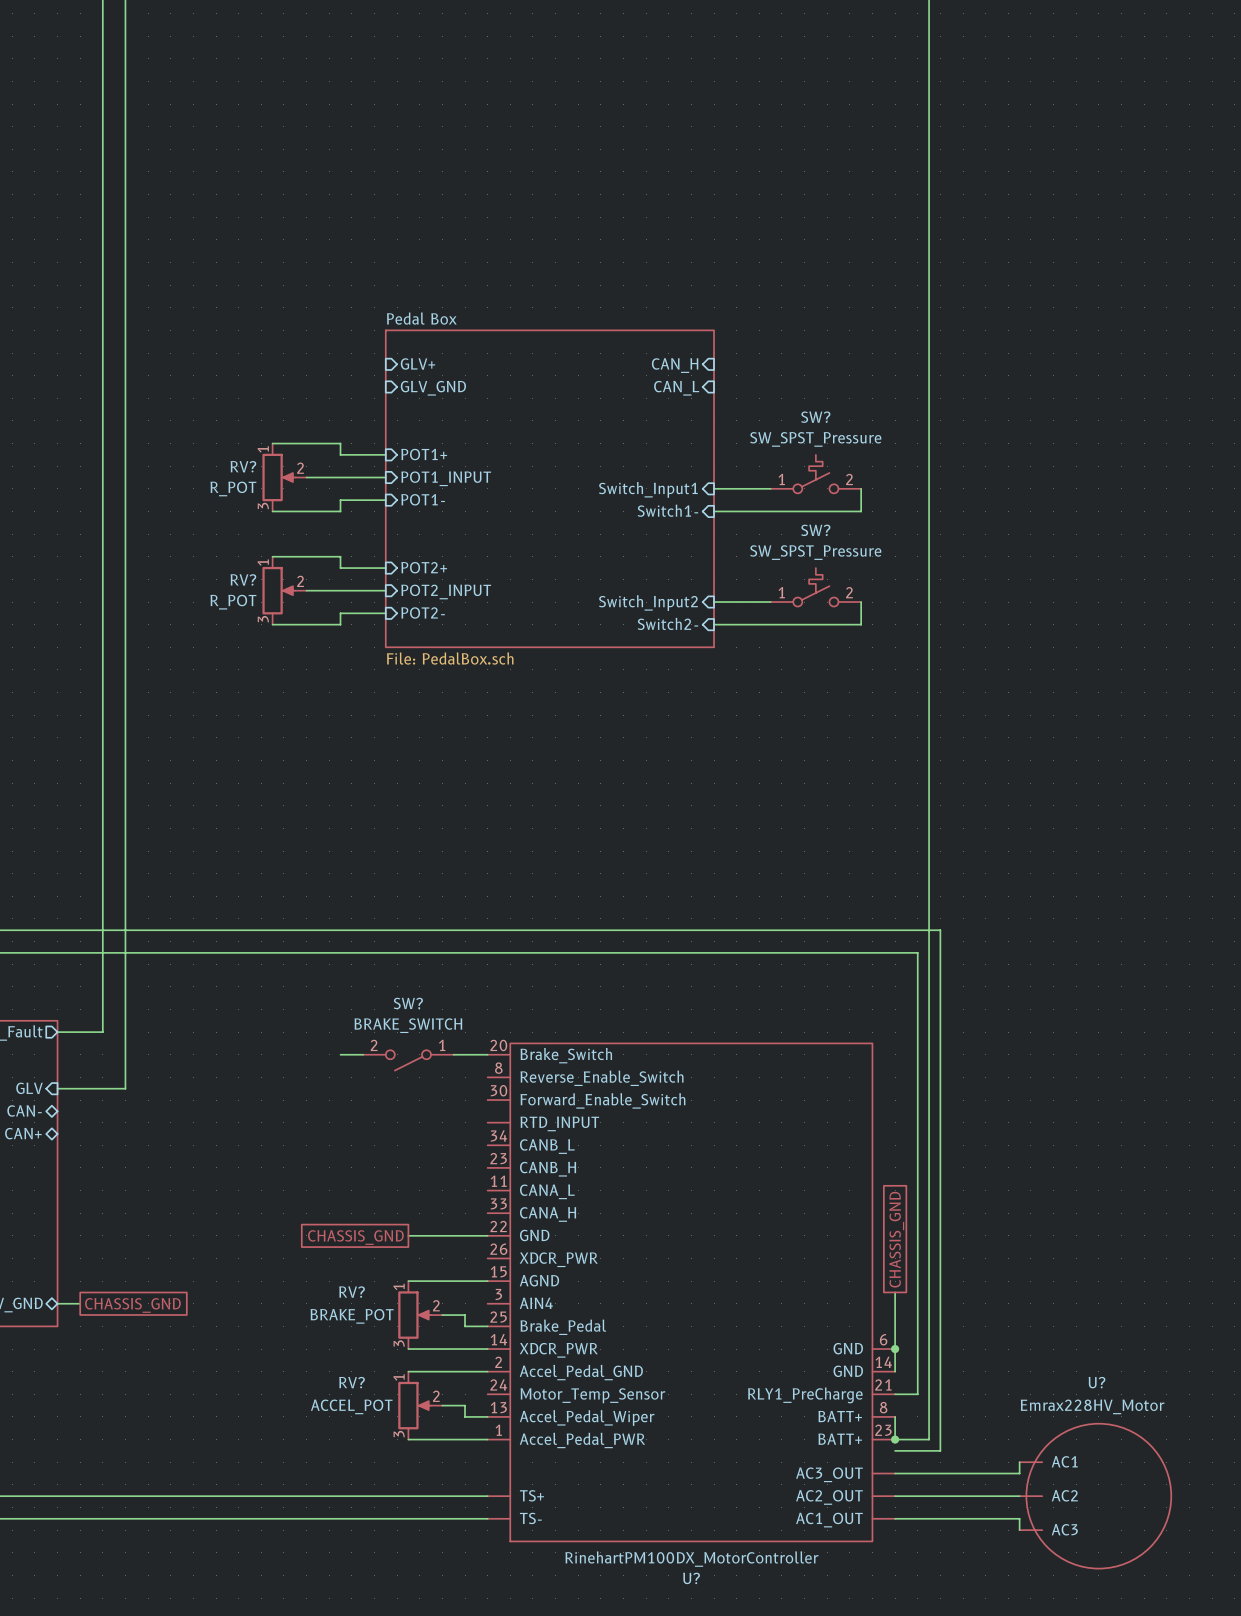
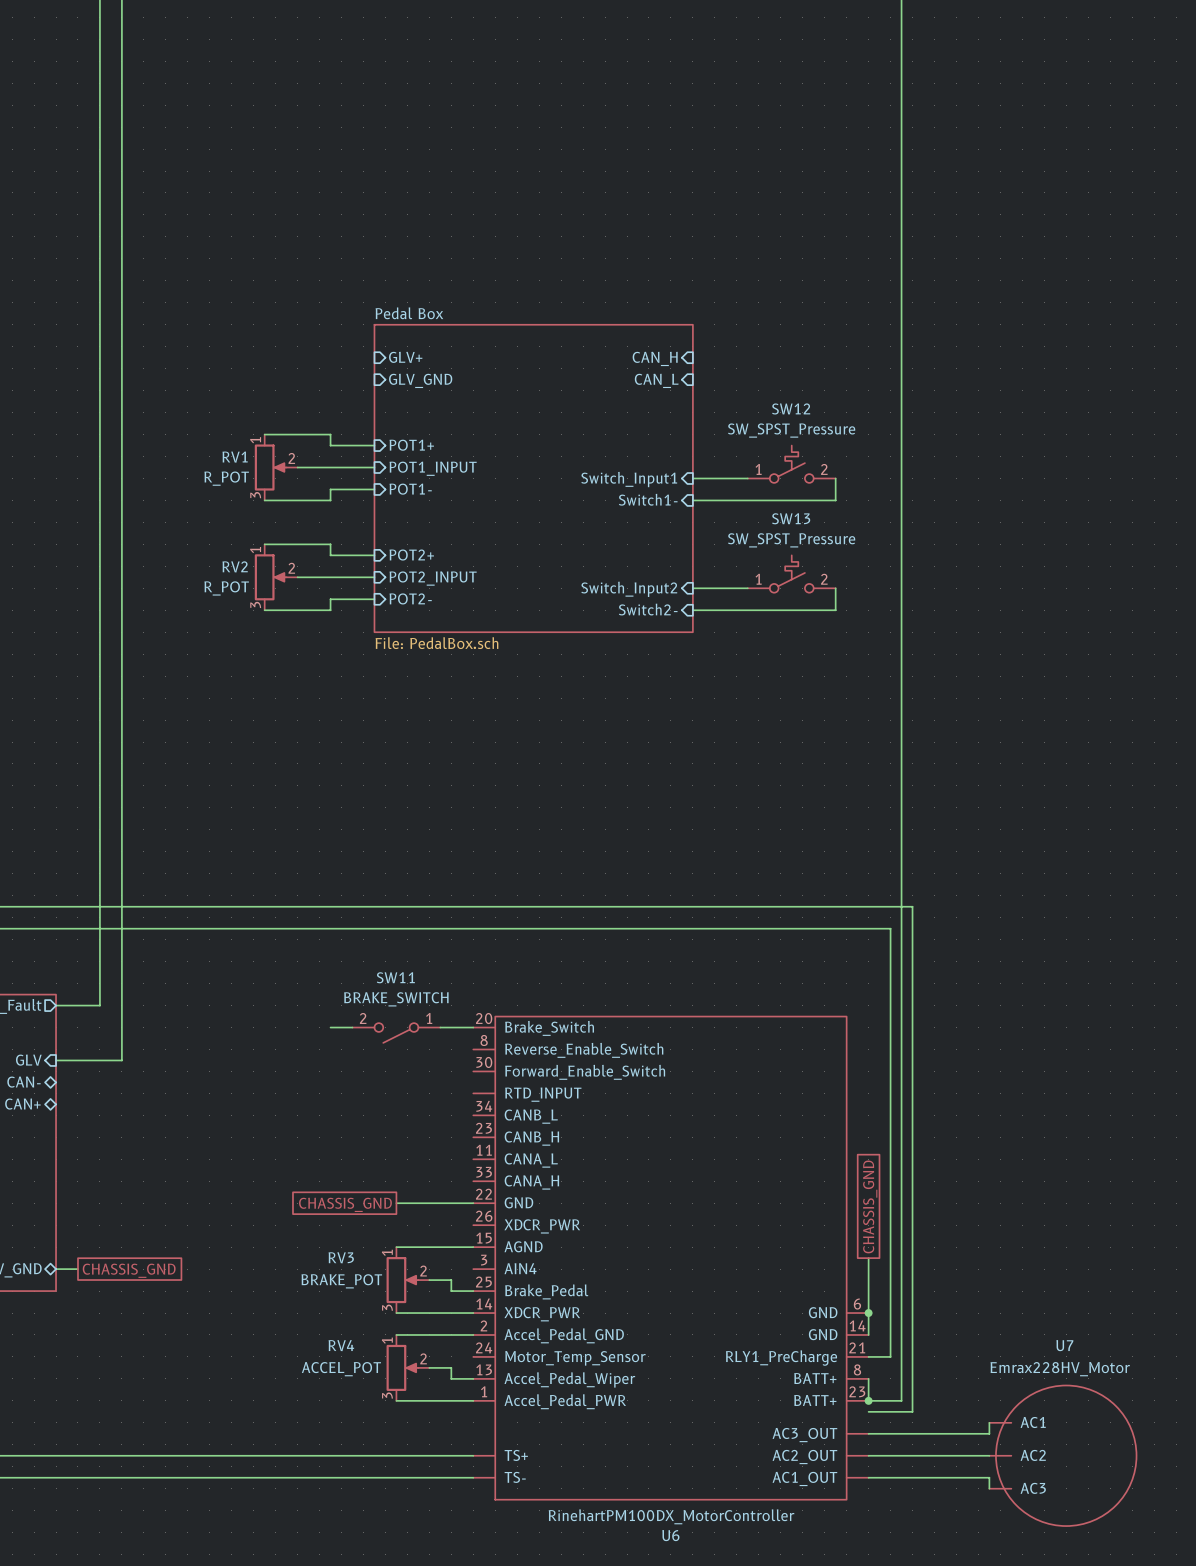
SW? name: SW? (815, 417) -> SW12 (791, 408)
RV? name: RV? (243, 466) -> RV1 (235, 457)
SW? name: SW? (815, 530) -> SW13 (791, 518)
RV? name: RV? (243, 579) -> RV2 (235, 566)
SW? name: SW? (408, 1003) -> SW11 (395, 977)
RV? name: RV? (352, 1292) -> RV3 (341, 1257)
RV? name: RV? (352, 1382) -> RV4 (341, 1345)
U? name: U? (1097, 1382) -> U7 (1064, 1345)
U? name: U? (691, 1578) -> U6 (670, 1535)

